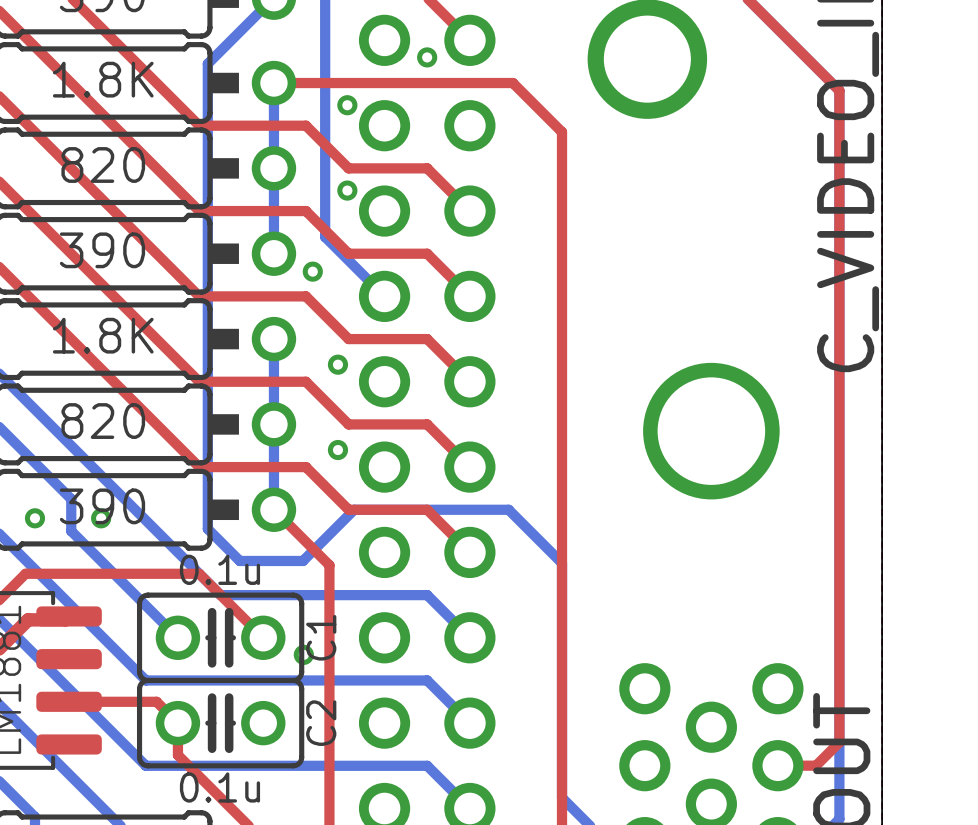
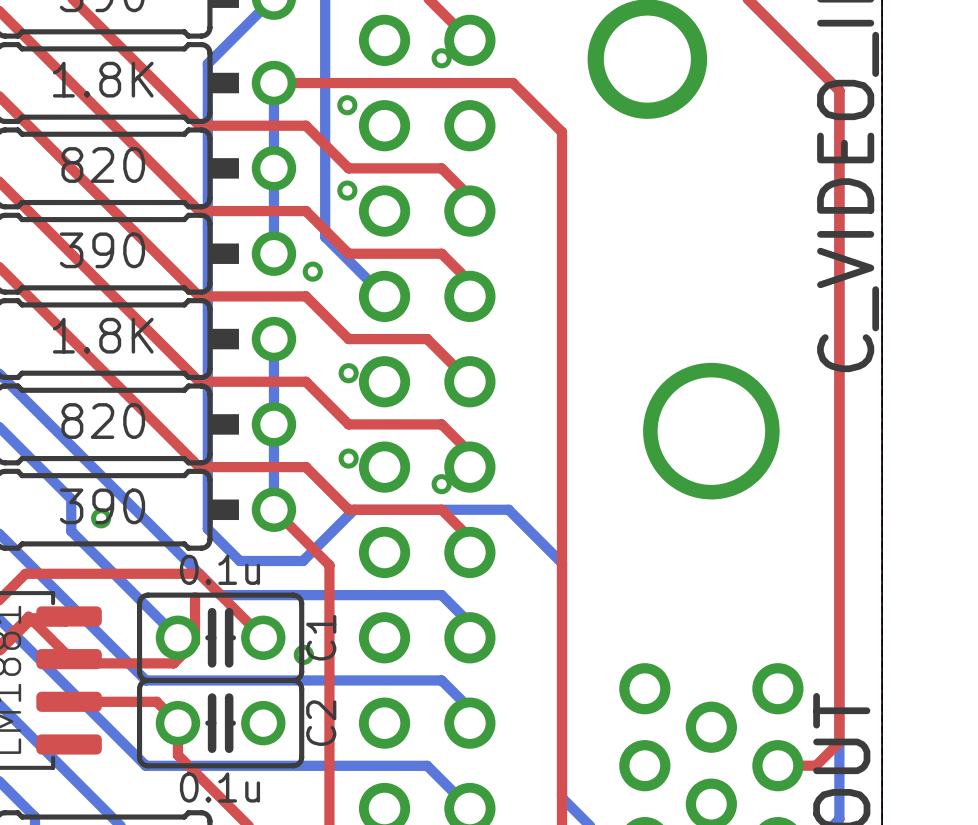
via position: (427, 57) -> (441, 58)
top track: (427, 168) (469, 211) -> (427, 168) (441, 168) (484, 211)
top track: (427, 253) (469, 296) -> (427, 253) (441, 253) (484, 296)
via position: (337, 364) -> (348, 373)
top track: (427, 424) (469, 467) -> (427, 424) (441, 424) (484, 467)
via position: (337, 450) -> (348, 458)
via: none -> (441, 484)
top track: (427, 509) (469, 552) -> (427, 509) (441, 509) (484, 552)
via: (34, 518) -> none
bottom track: (427, 595) (469, 637) -> (427, 595) (441, 595) (484, 637)
top track: none -> (195, 597) (195, 642) (173, 663) (75, 663) (28, 616)
bottom track: (427, 680) (469, 723) -> (427, 680) (441, 680) (484, 723)

